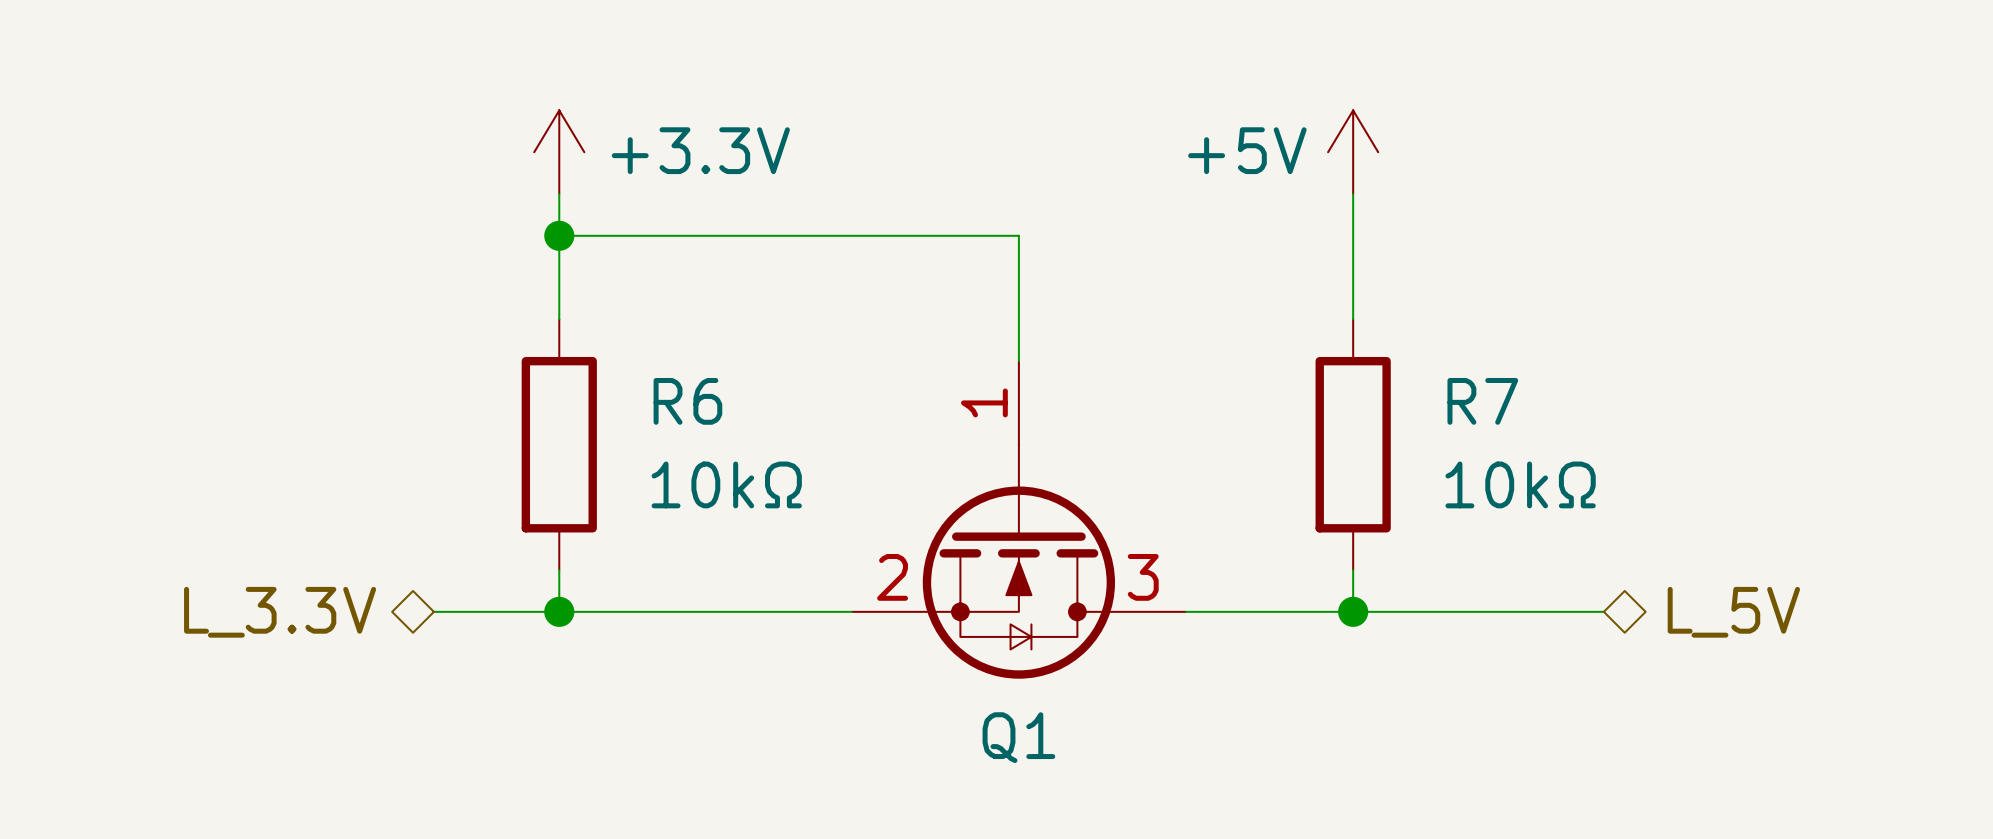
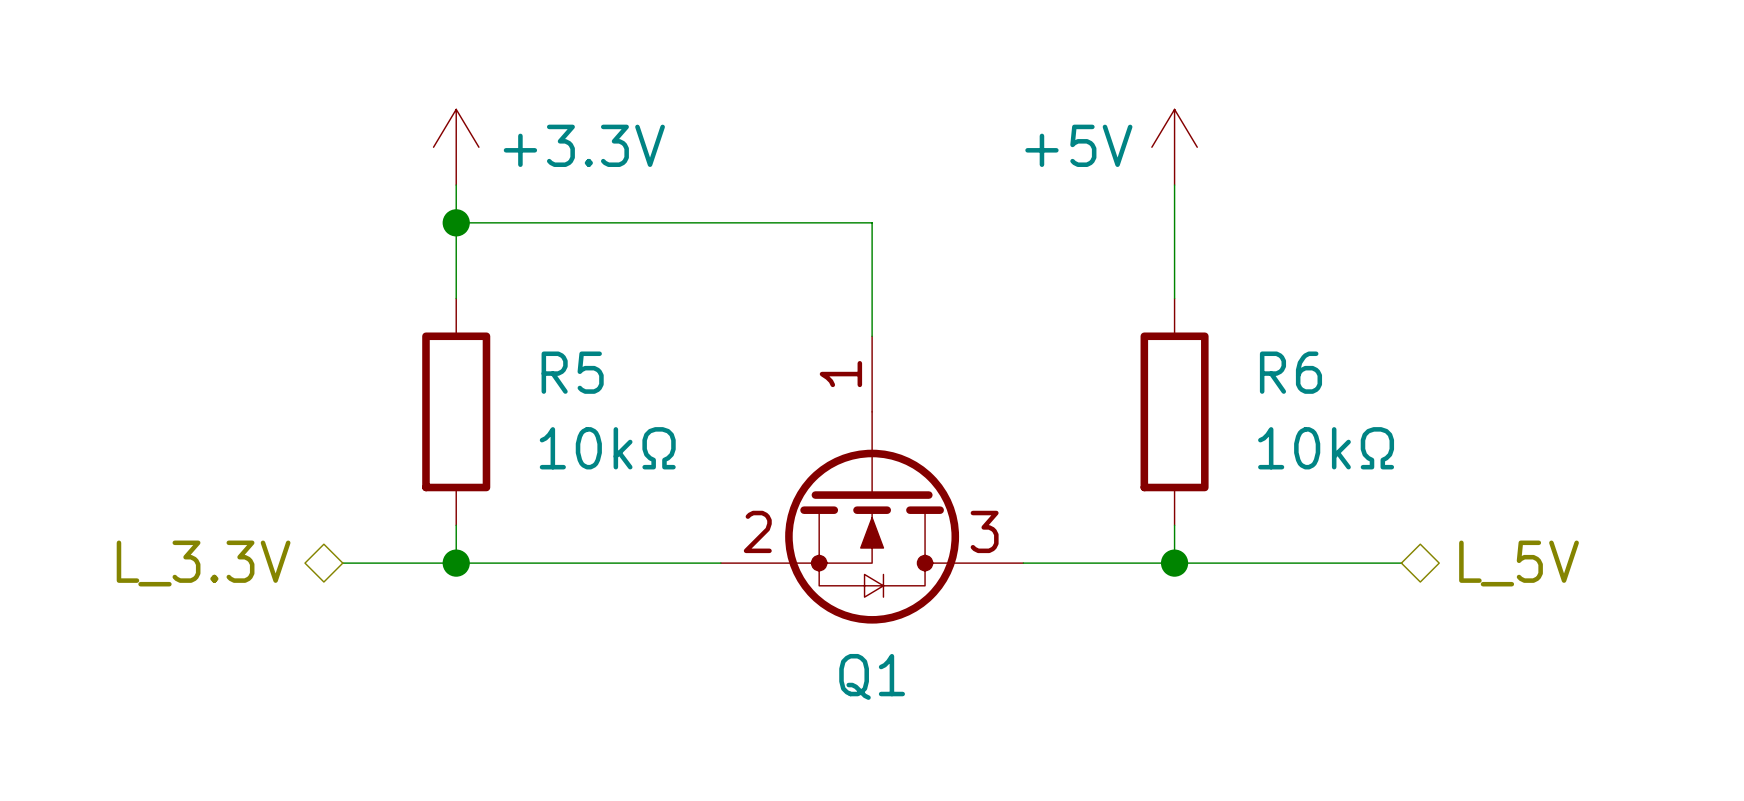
R6 name: R6 (687, 401) -> R5 (572, 372)
R7 name: R7 (1482, 401) -> R6 (1290, 372)

